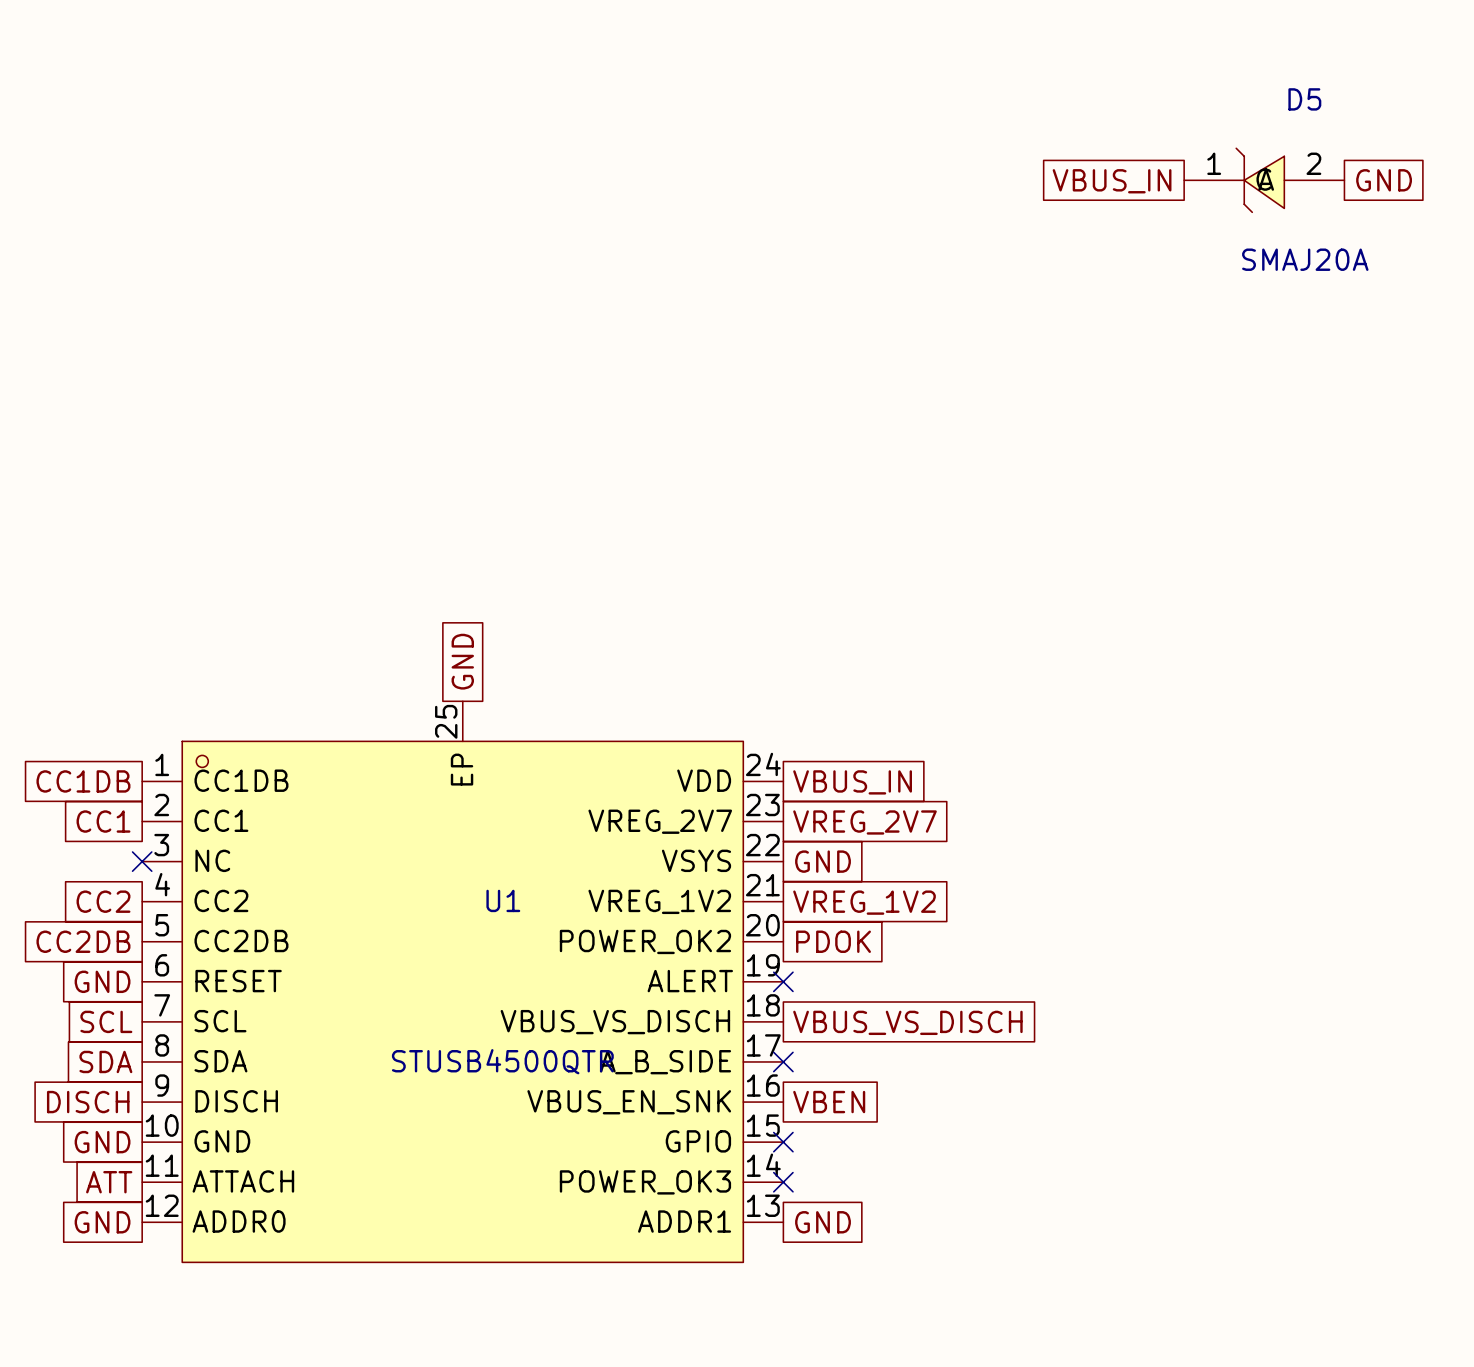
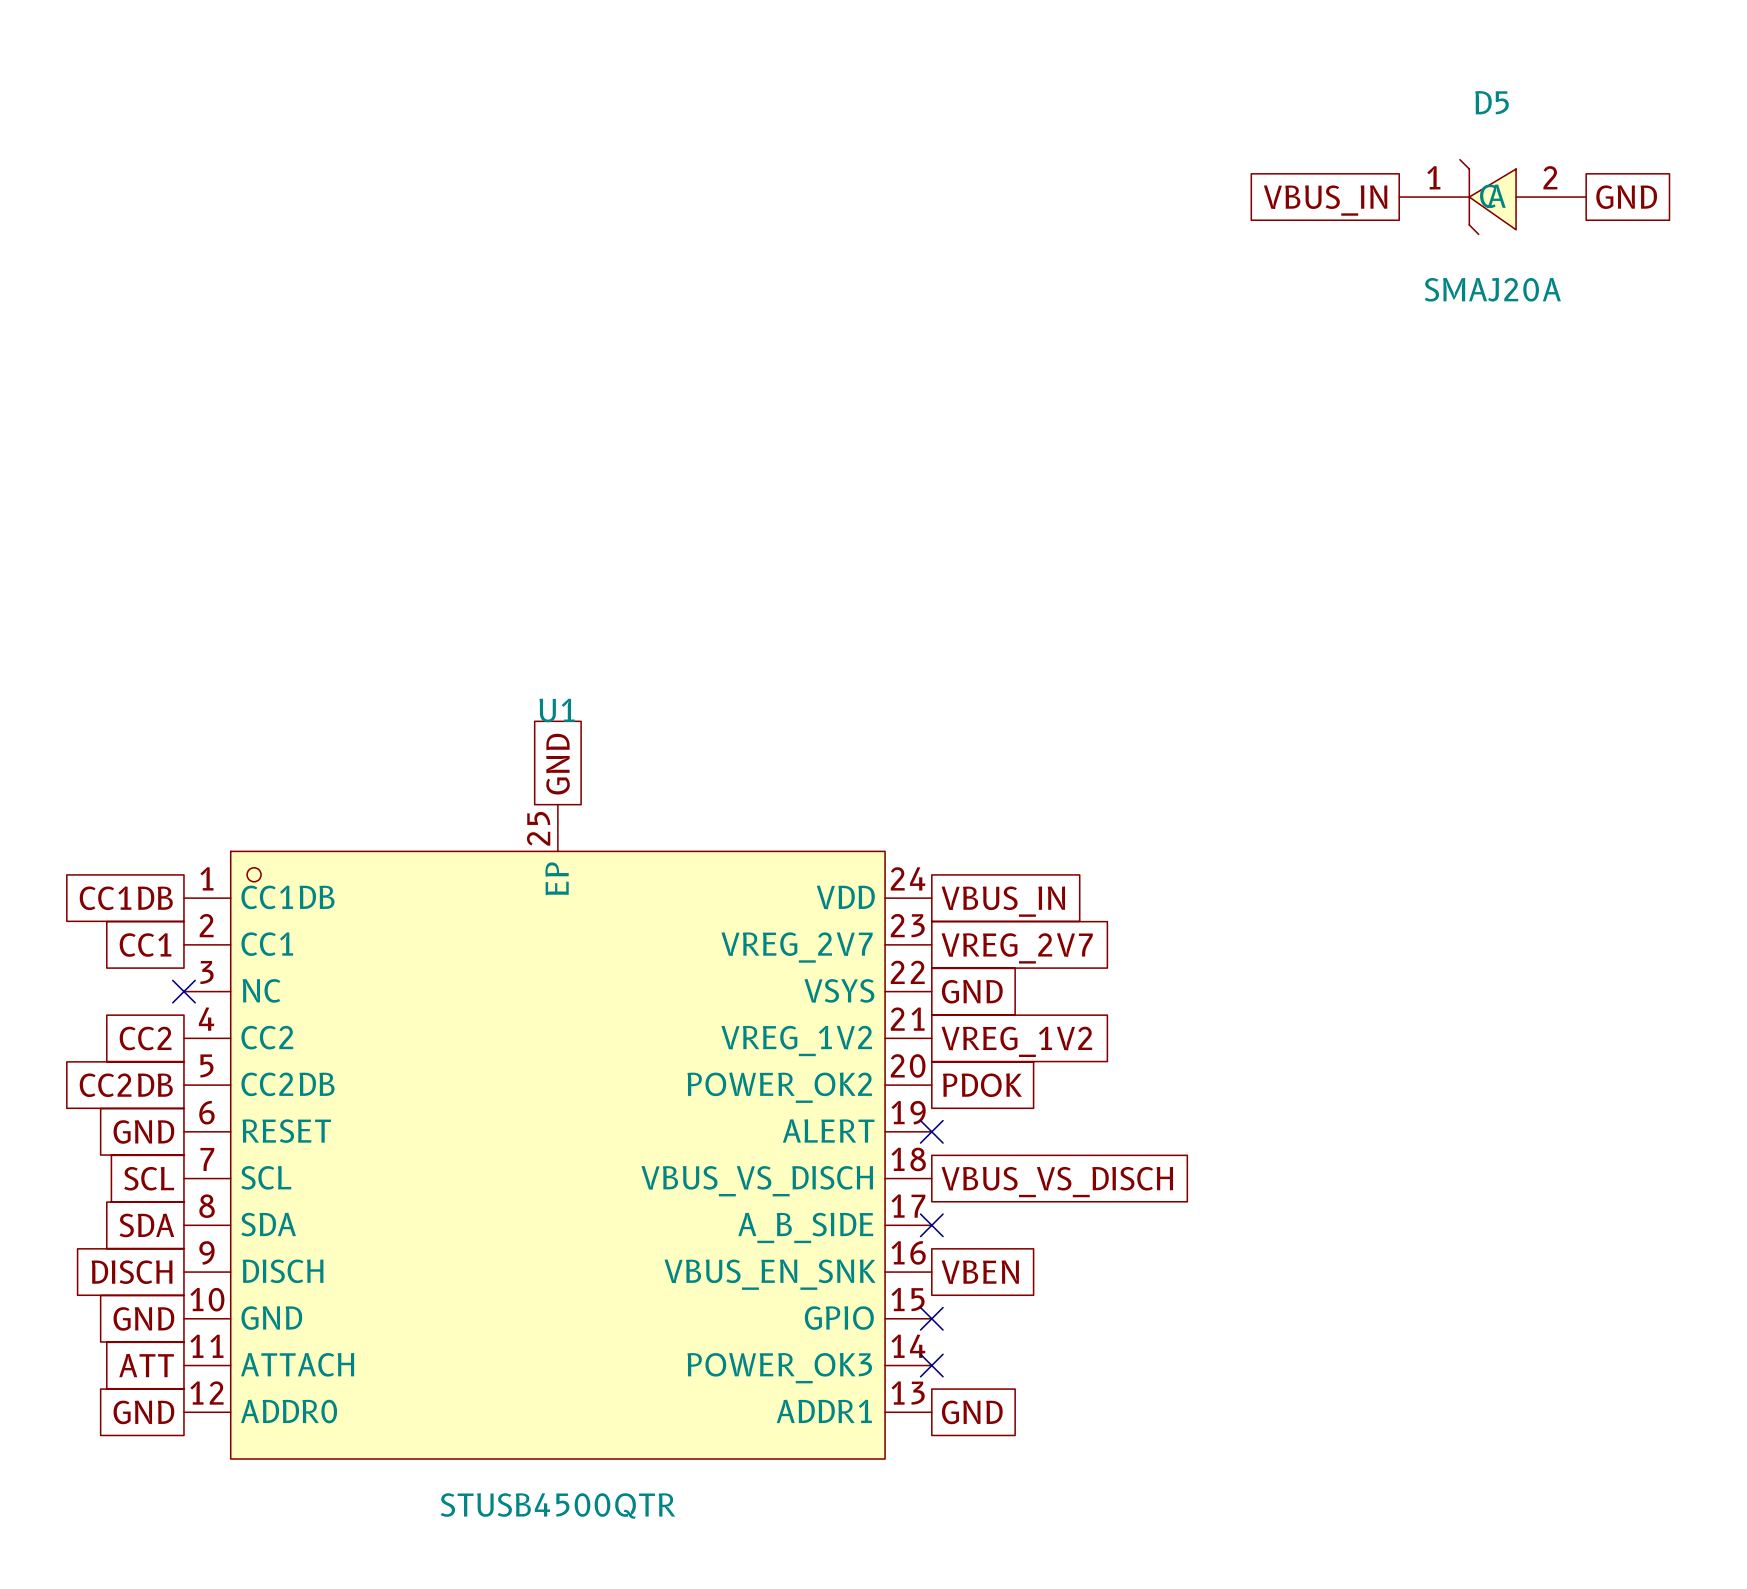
D5 name position: D5 (1304, 99) -> D5 (1492, 102)
D5 value position: SMAJ20A (1305, 259) -> SMAJ20A (1492, 289)
U1 name position: U1 (503, 900) -> U1 (557, 710)
U1 value position: STUSB4500QTR (502, 1061) -> STUSB4500QTR (558, 1505)

